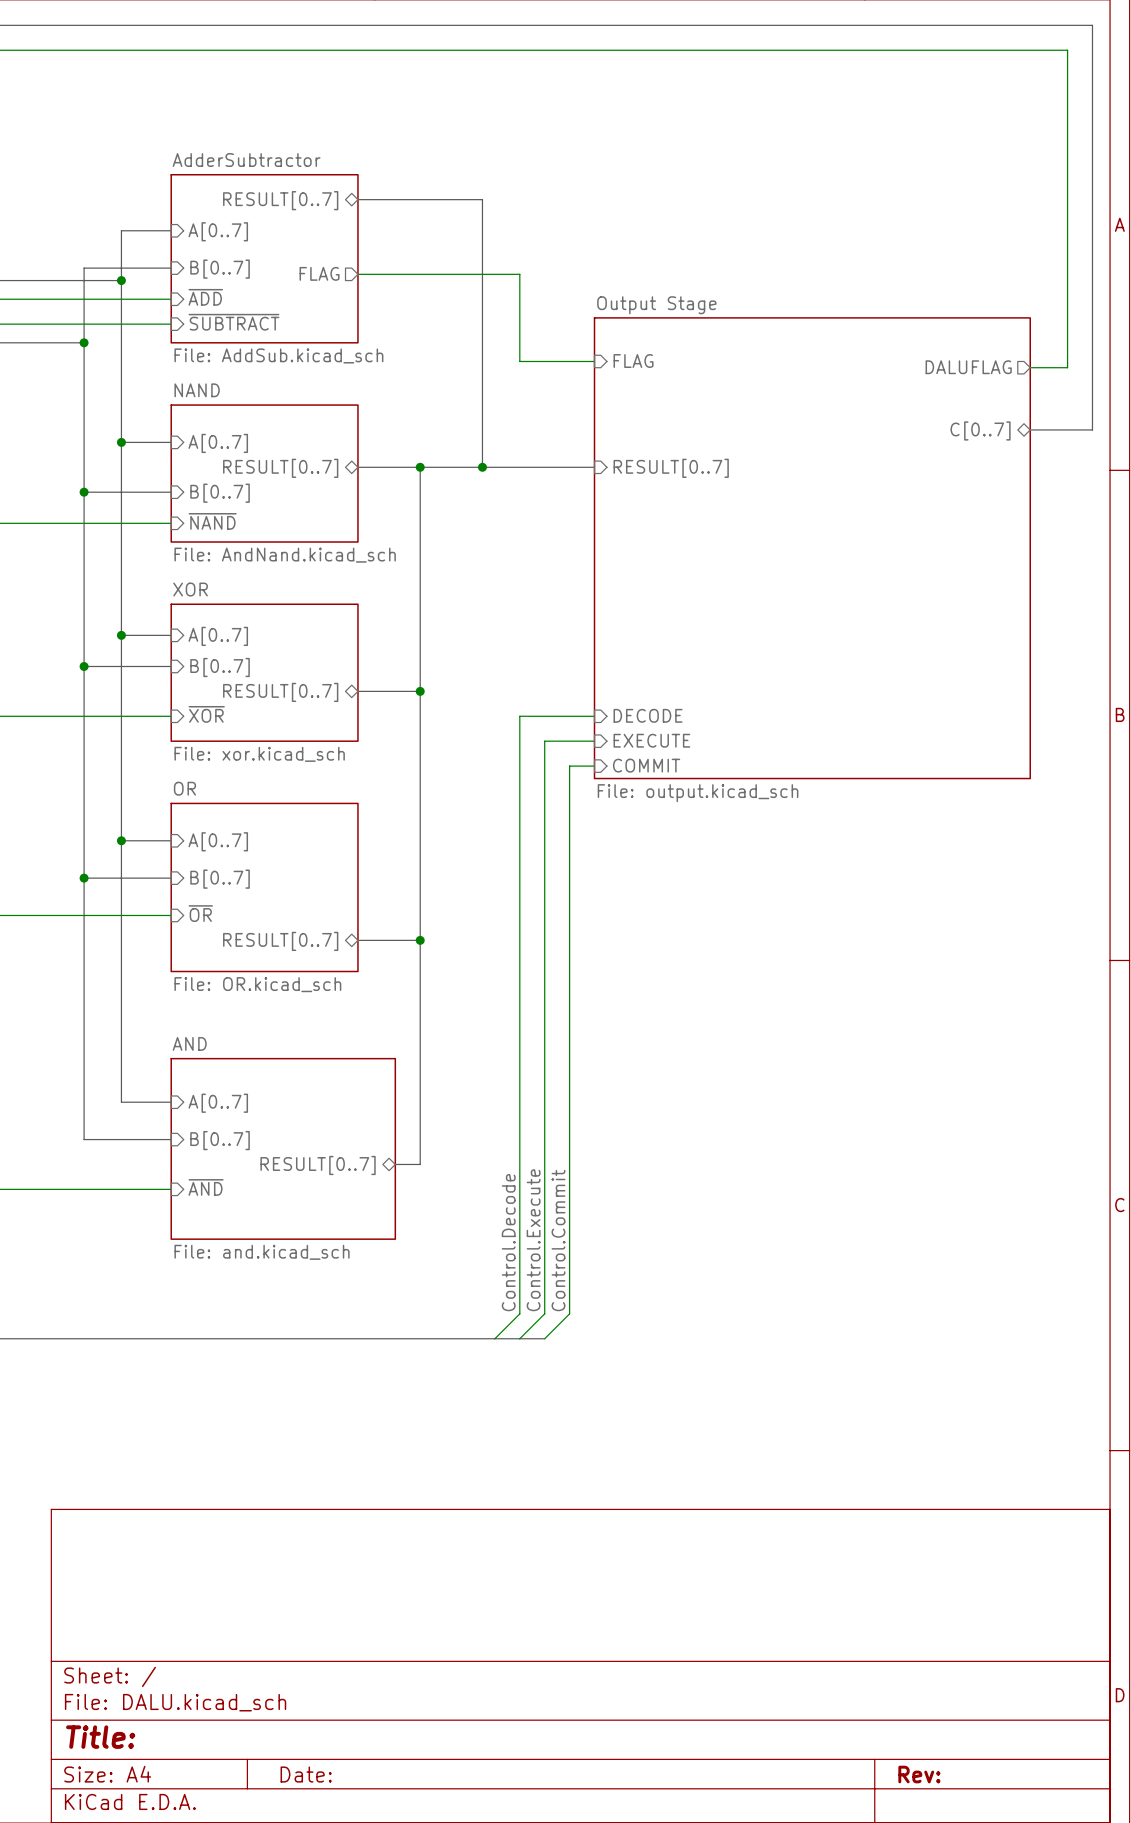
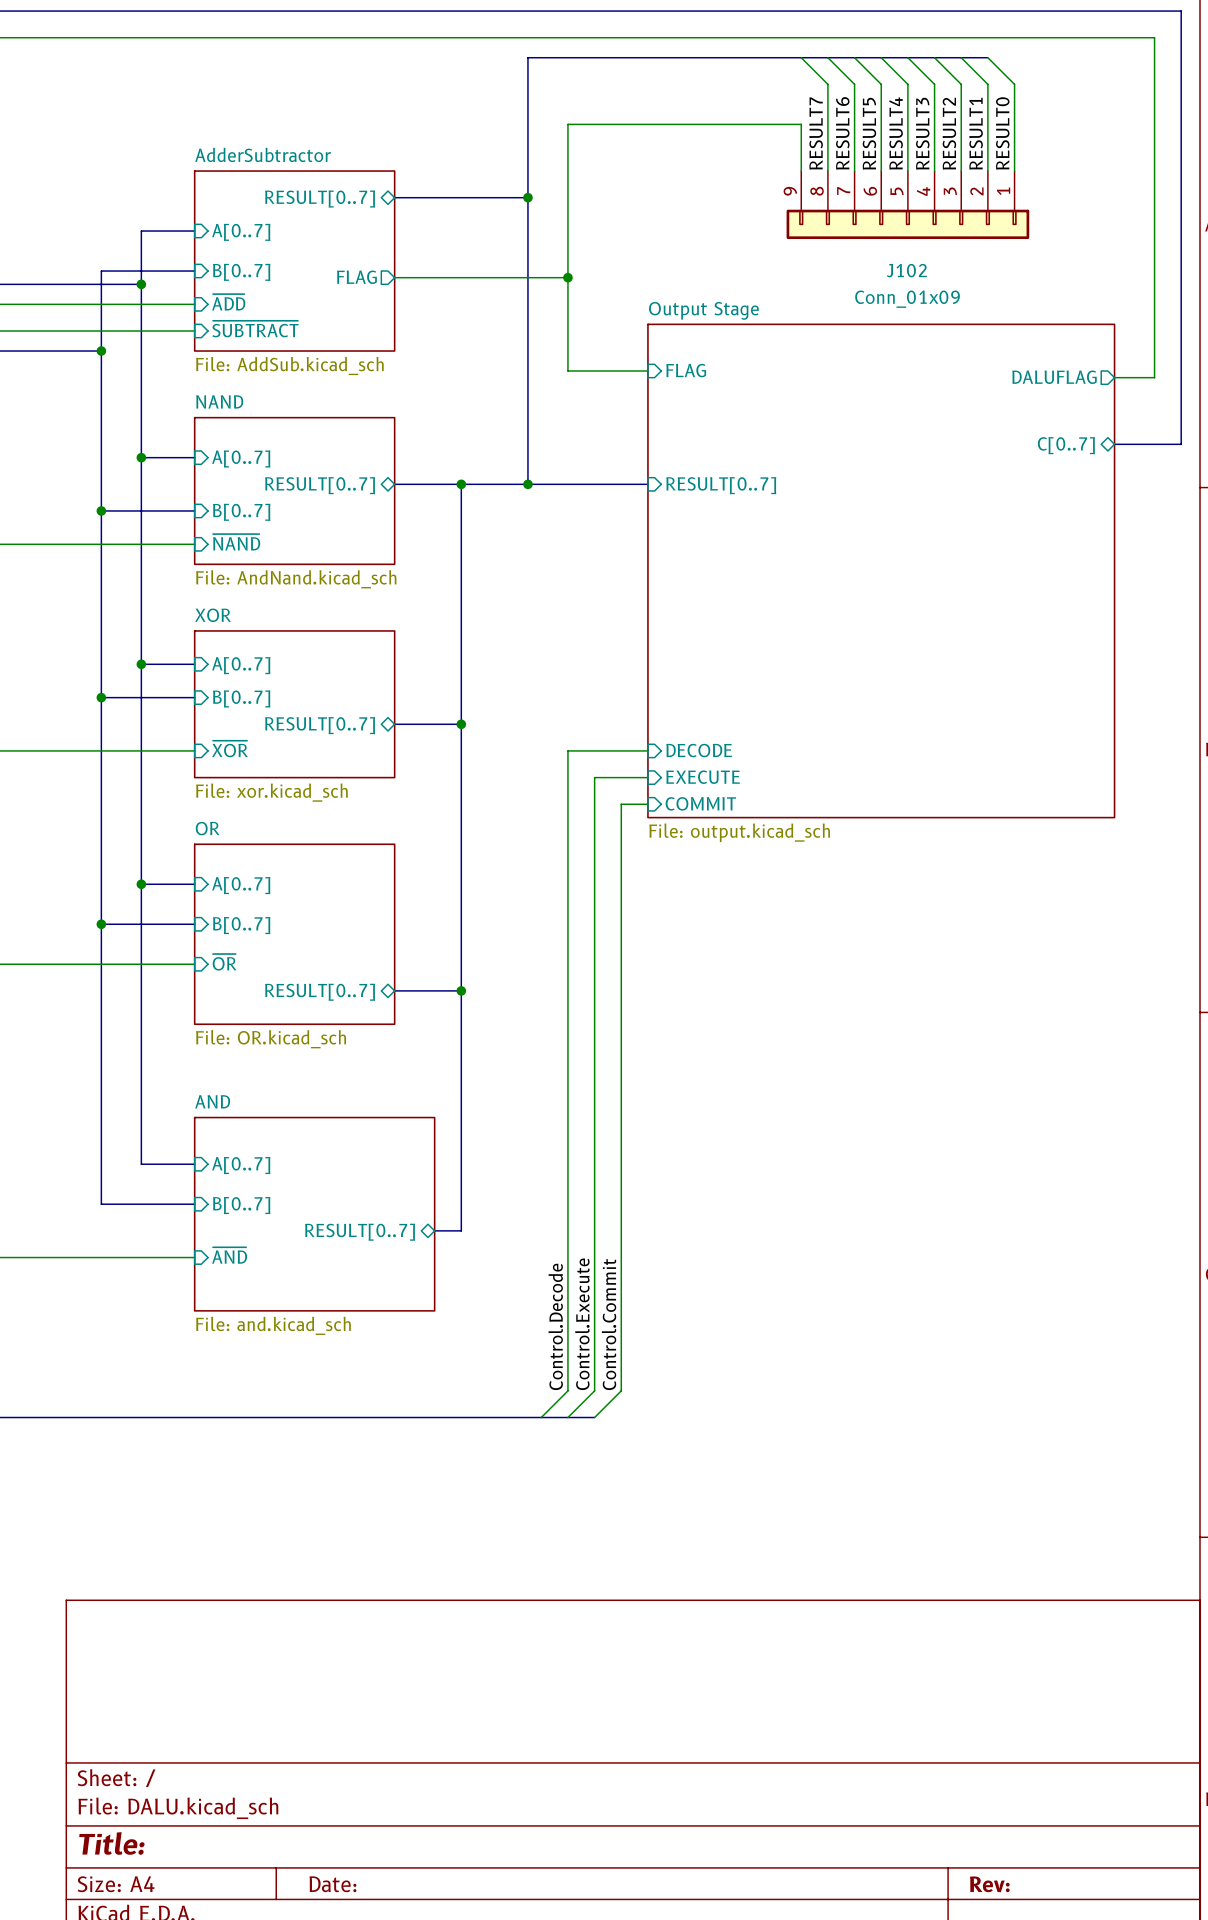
wire: none -> (801, 57) (827, 84)
wire: none -> (827, 57) (854, 84) (854, 171)
wire: none -> (854, 57) (881, 84) (881, 171)
wire: none -> (881, 57) (907, 84) (907, 171)
wire: none -> (907, 57) (934, 84)
wire: none -> (934, 57) (961, 84) (961, 171)
wire: none -> (961, 57) (987, 84) (987, 171)
wire: none -> (987, 57) (1014, 84)
bus: none -> (987, 57) (527, 57) (527, 197)
wire: none -> (827, 84) (827, 171)
wire: none -> (934, 84) (934, 171)
wire: none -> (1014, 84) (1014, 171)
label: none -> RESULT7 (816, 133)
label: none -> RESULT6 (842, 133)
label: none -> RESULT5 (869, 133)
label: none -> RESULT4 (896, 133)
label: none -> RESULT3 (922, 133)
label: none -> RESULT2 (949, 133)
label: none -> RESULT1 (976, 133)
label: none -> RESULT0 (1002, 133)
wire: none -> (801, 171) (801, 124) (567, 124) (567, 277)
junction: none -> (527, 197)
J102: none -> Conn_01x09 (907, 205)
junction: none -> (567, 277)

